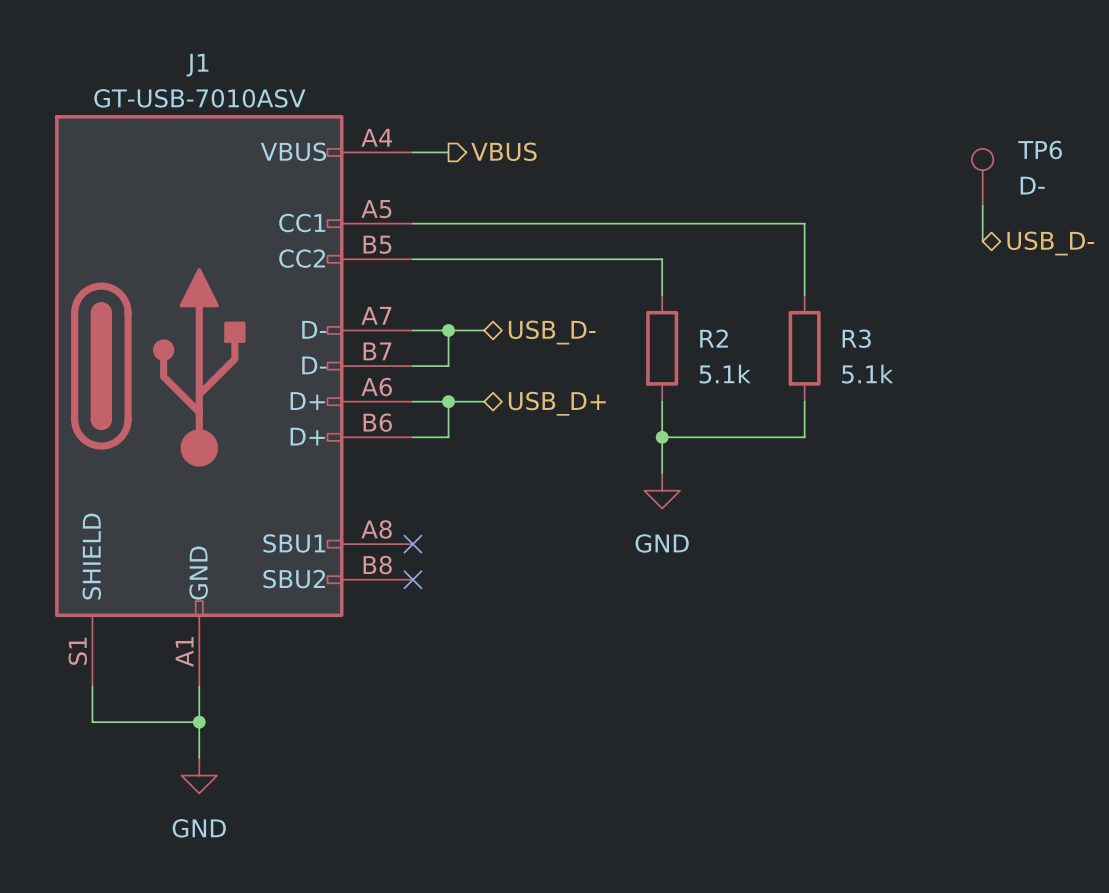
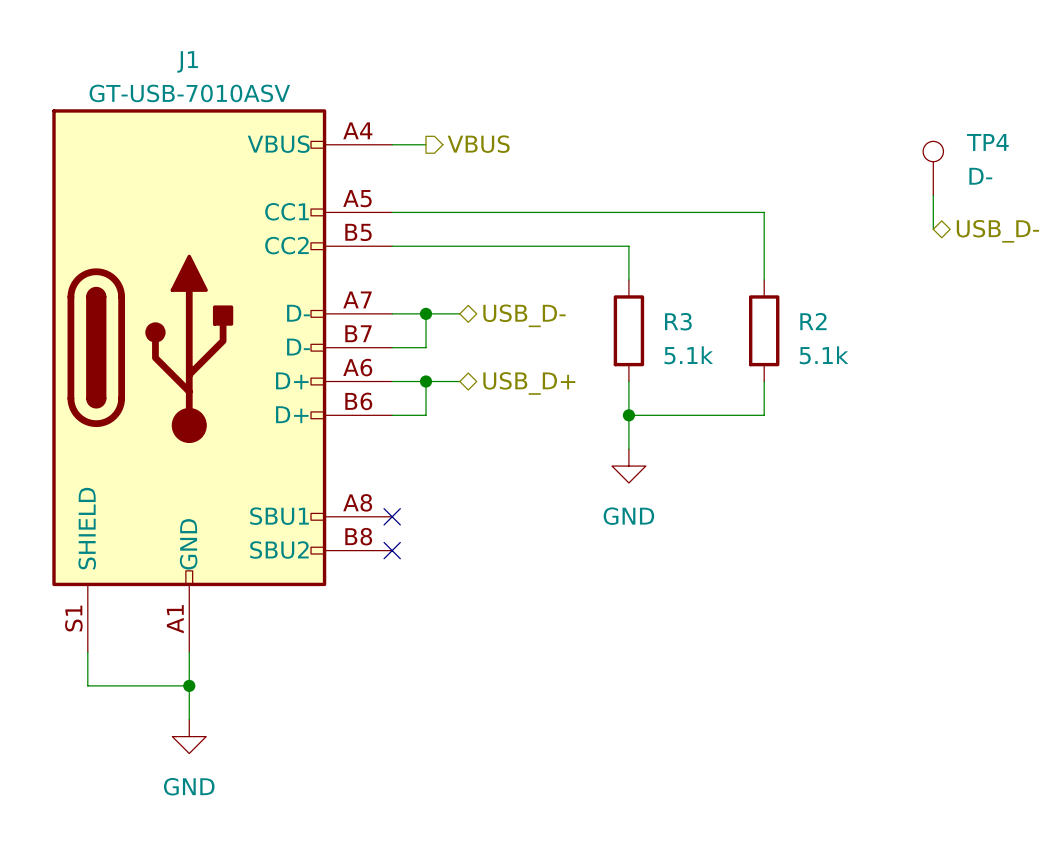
TP6 name: TP6 (1040, 150) -> TP4 (987, 142)
R2 name: R2 (714, 338) -> R3 (678, 321)
R3 name: R3 (856, 338) -> R2 (813, 321)

